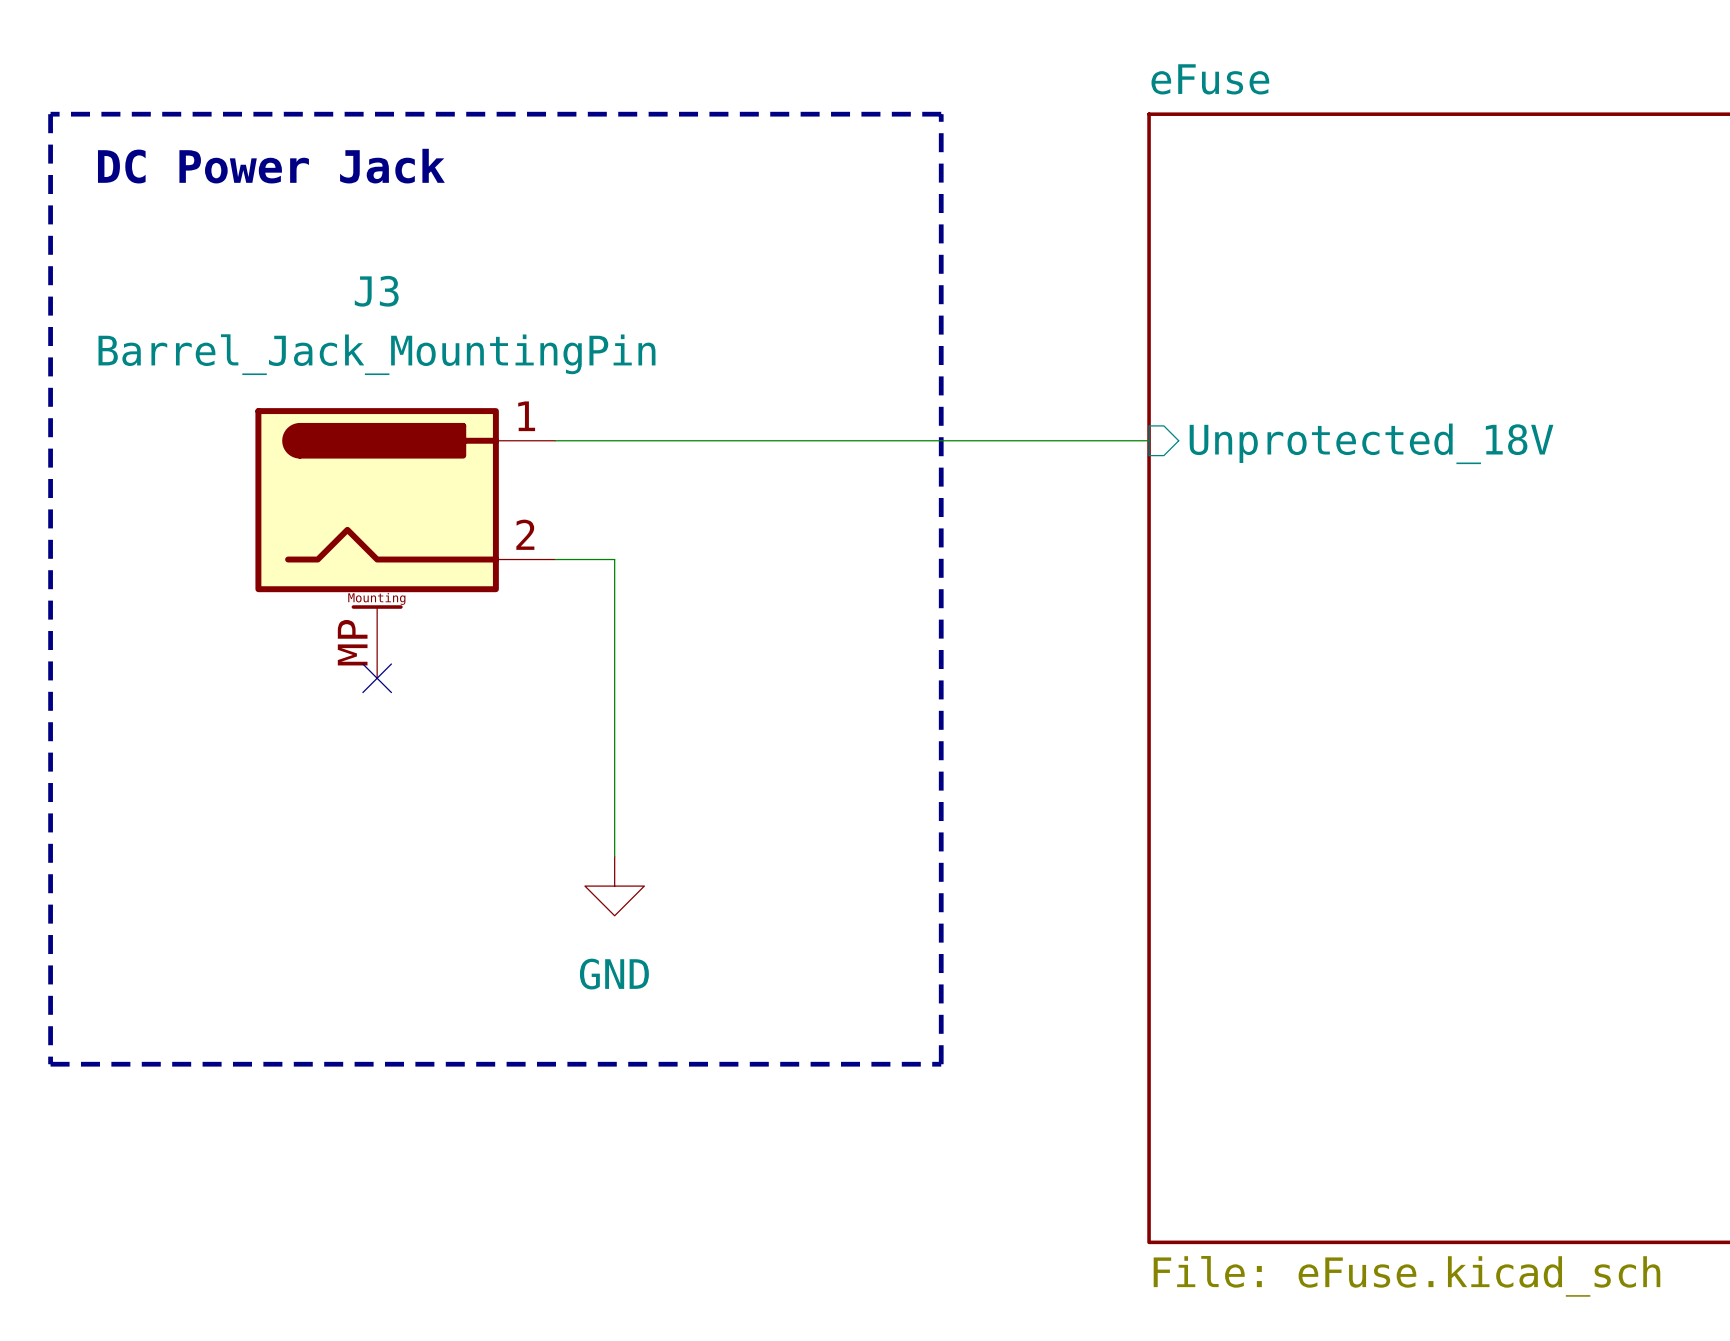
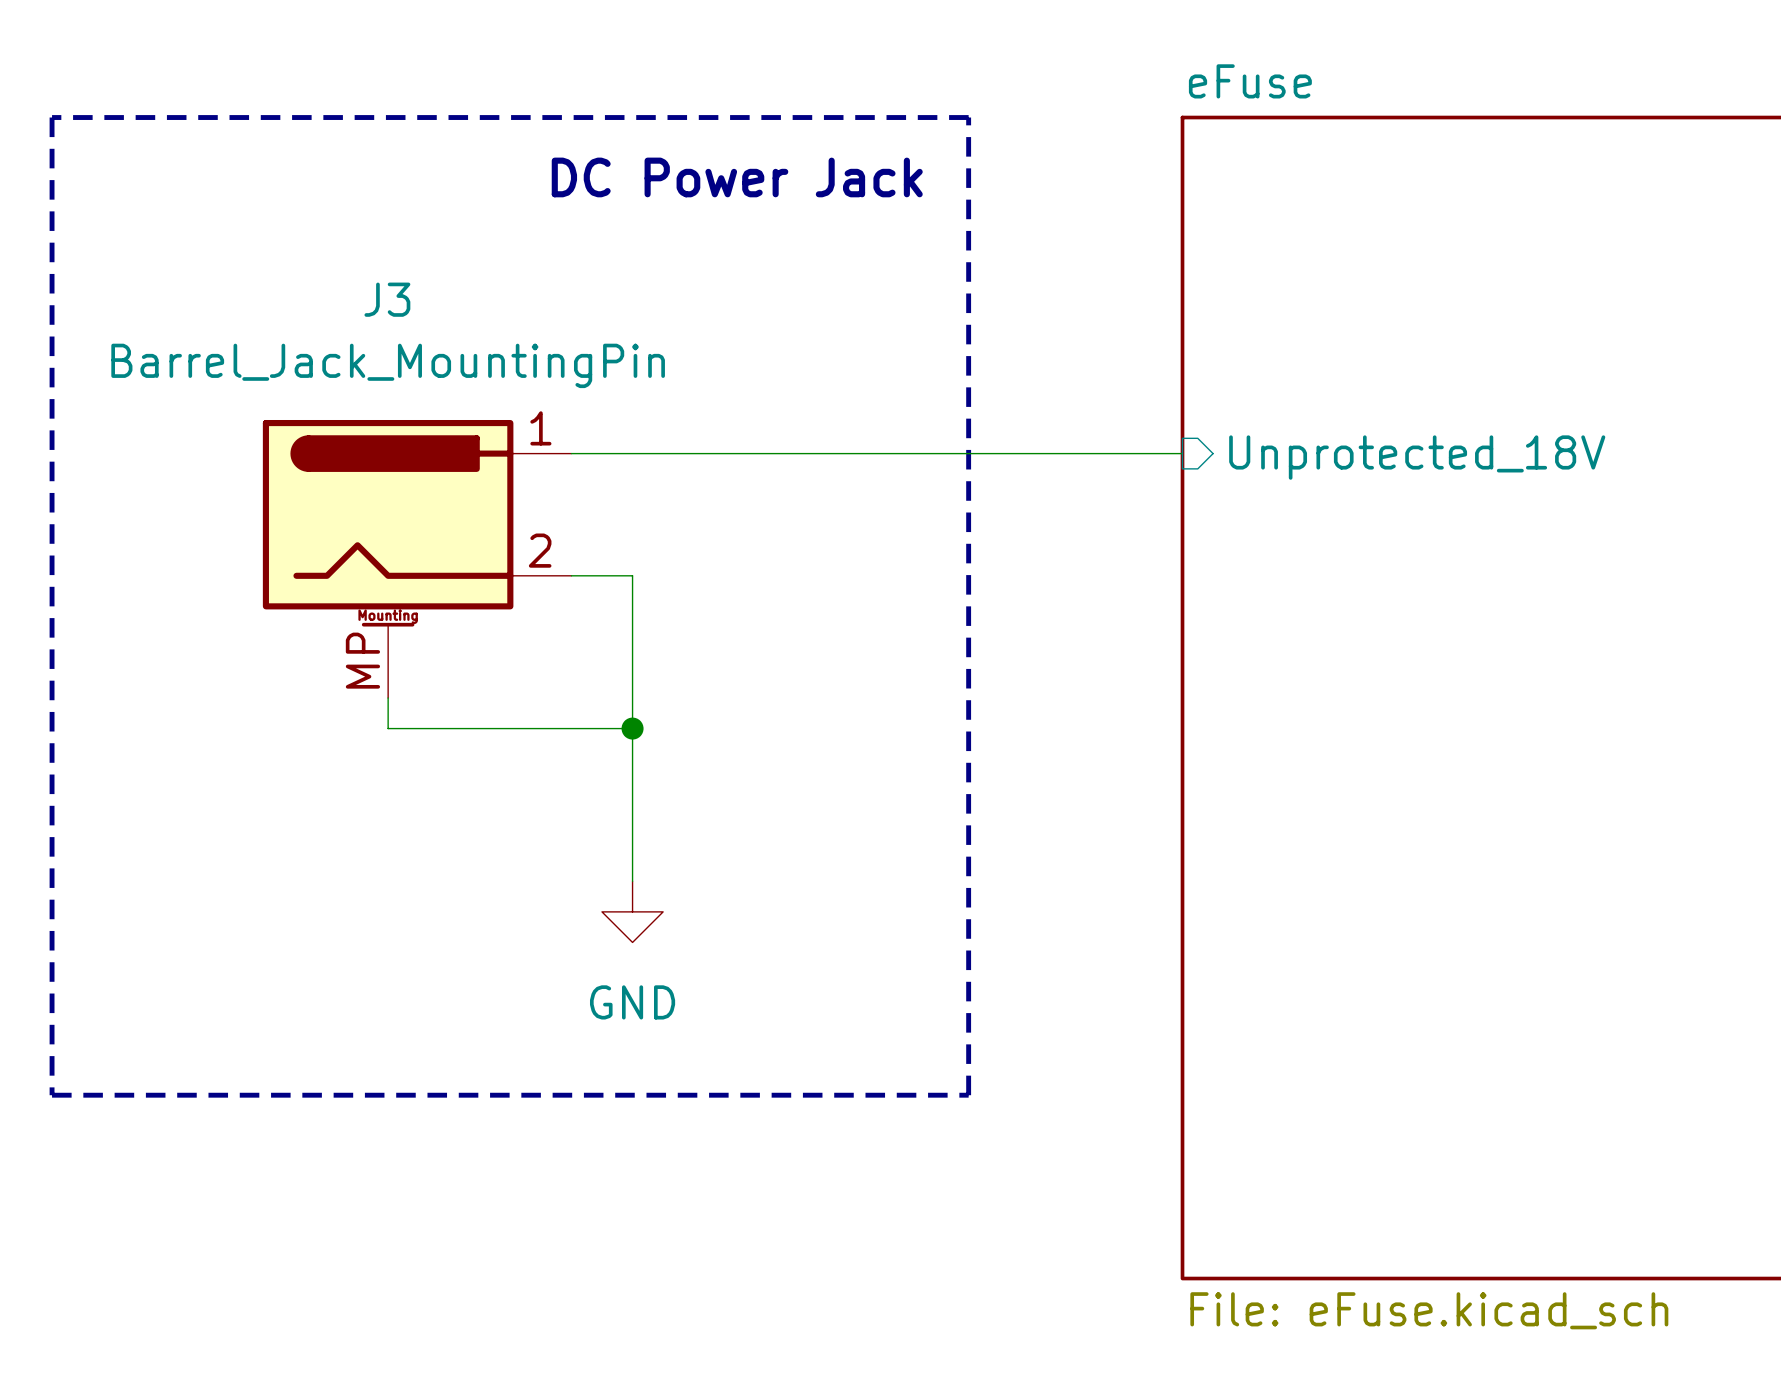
text position: DC Power Jack (271, 166) -> DC Power Jack (737, 177)
wire: none -> (388, 698) (388, 728) (632, 728)
no-connect mark: (377, 678) -> none
junction: none -> (632, 728)

